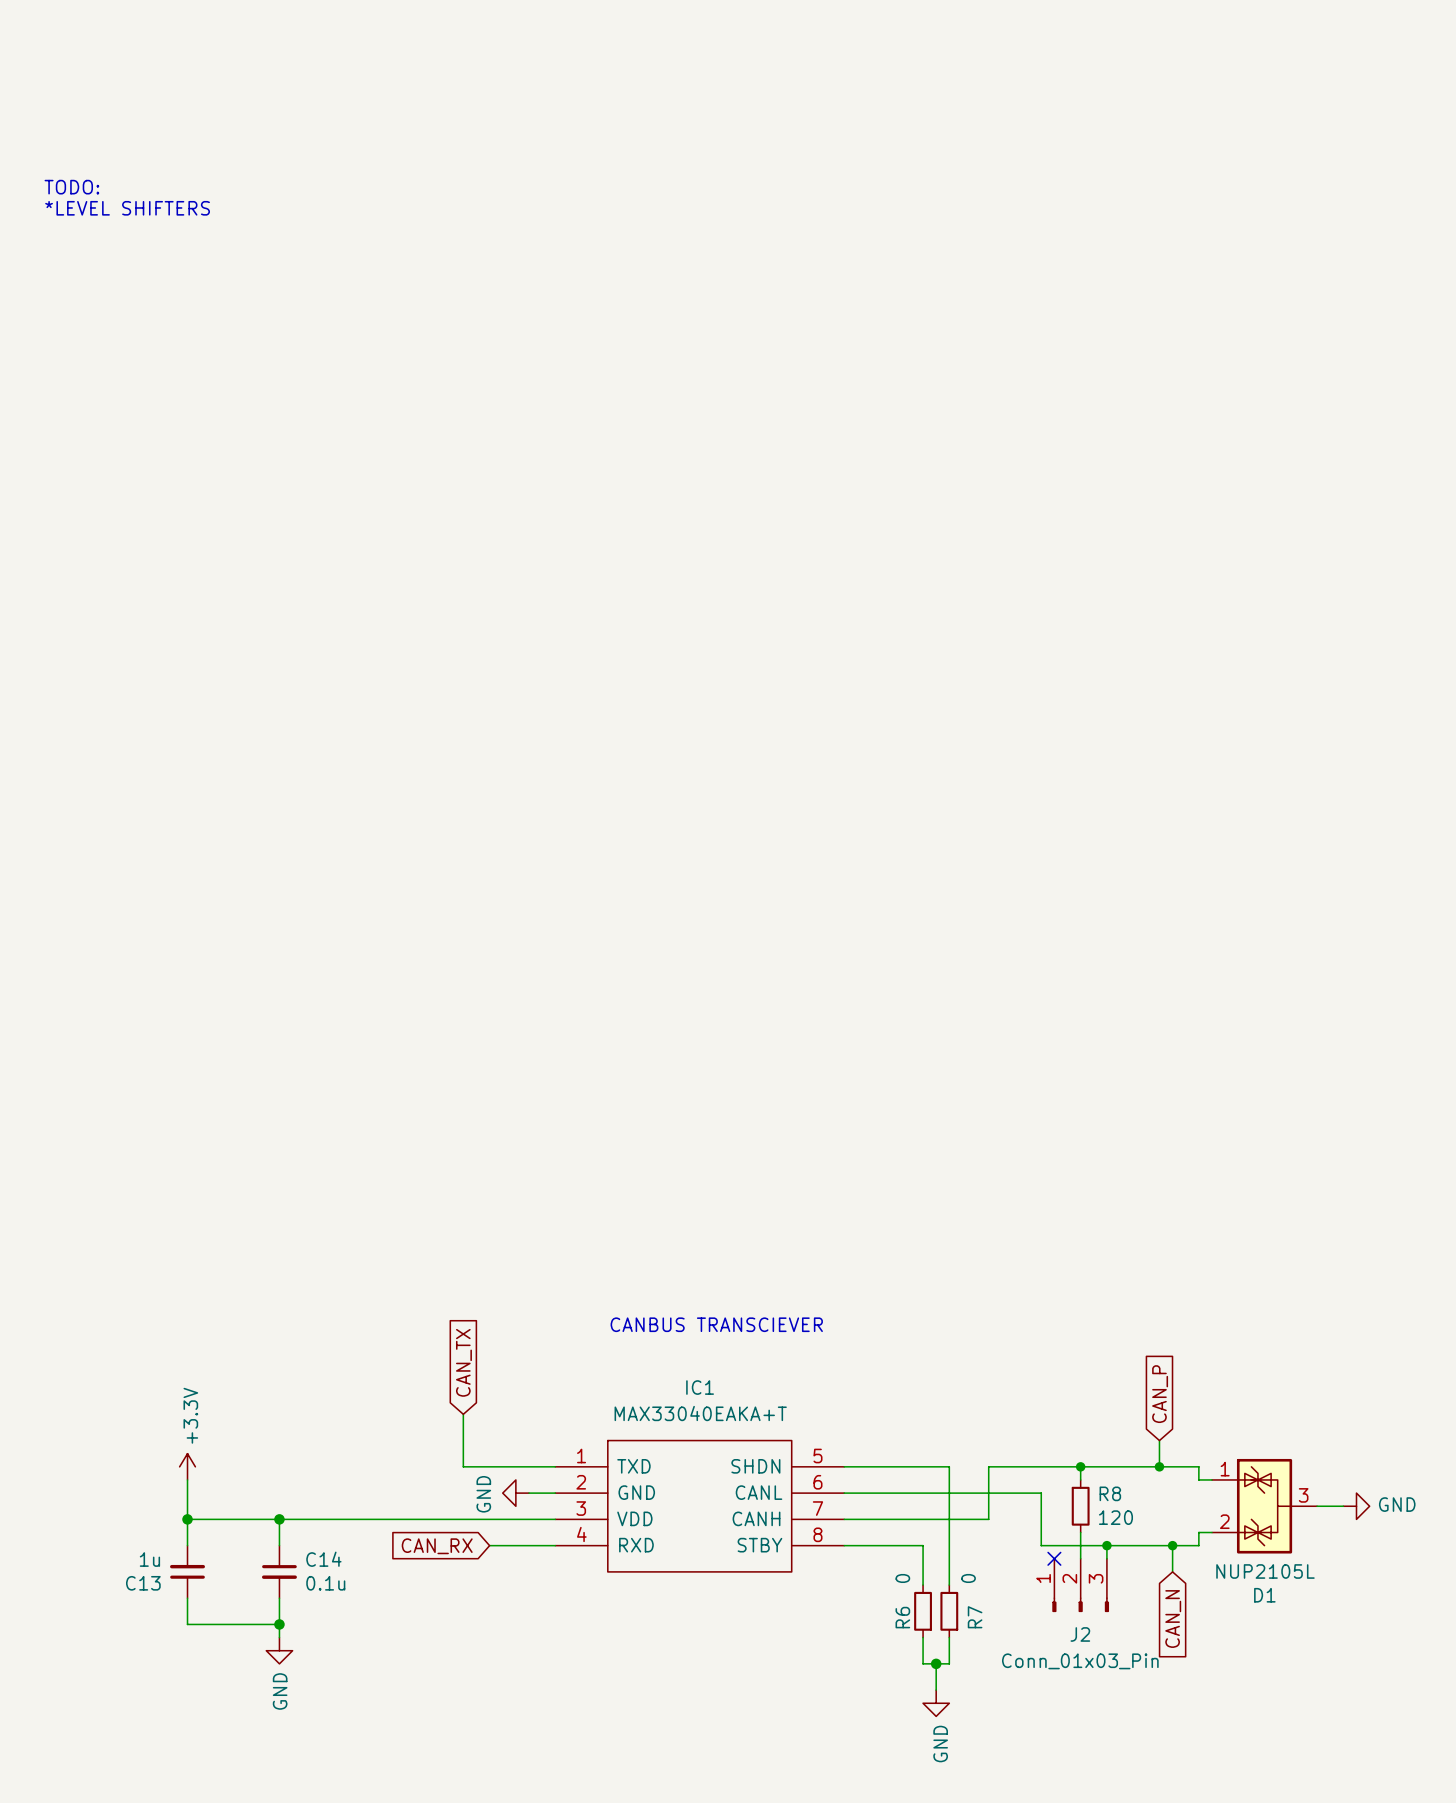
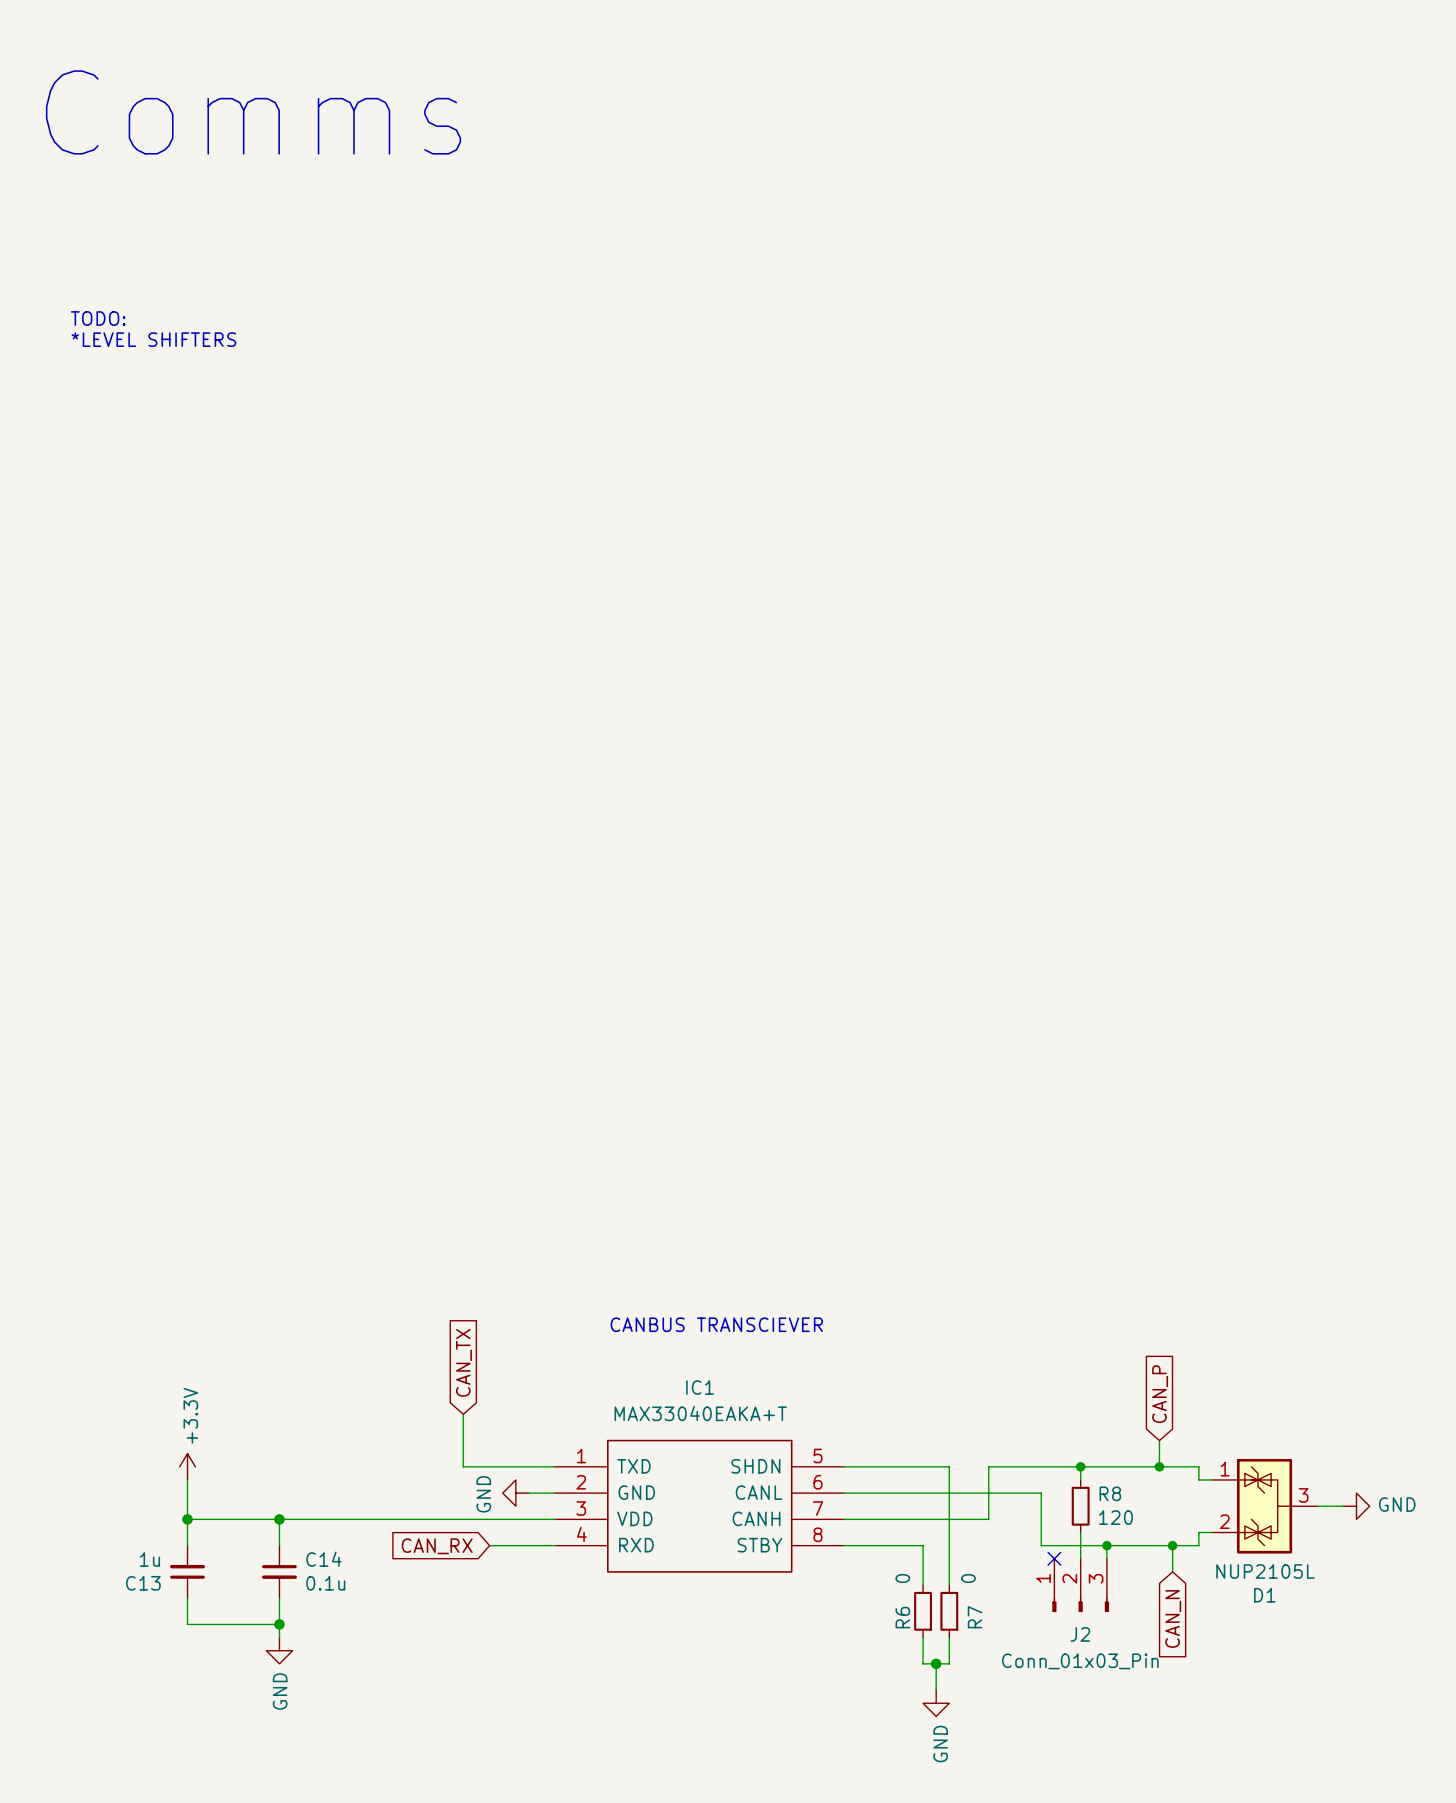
text: none -> Comms (253, 112)
text position: TODO: (71, 187) -> TODO: (98, 318)
text position: *LEVEL SHIFTERS (127, 208) -> *LEVEL SHIFTERS (153, 339)

